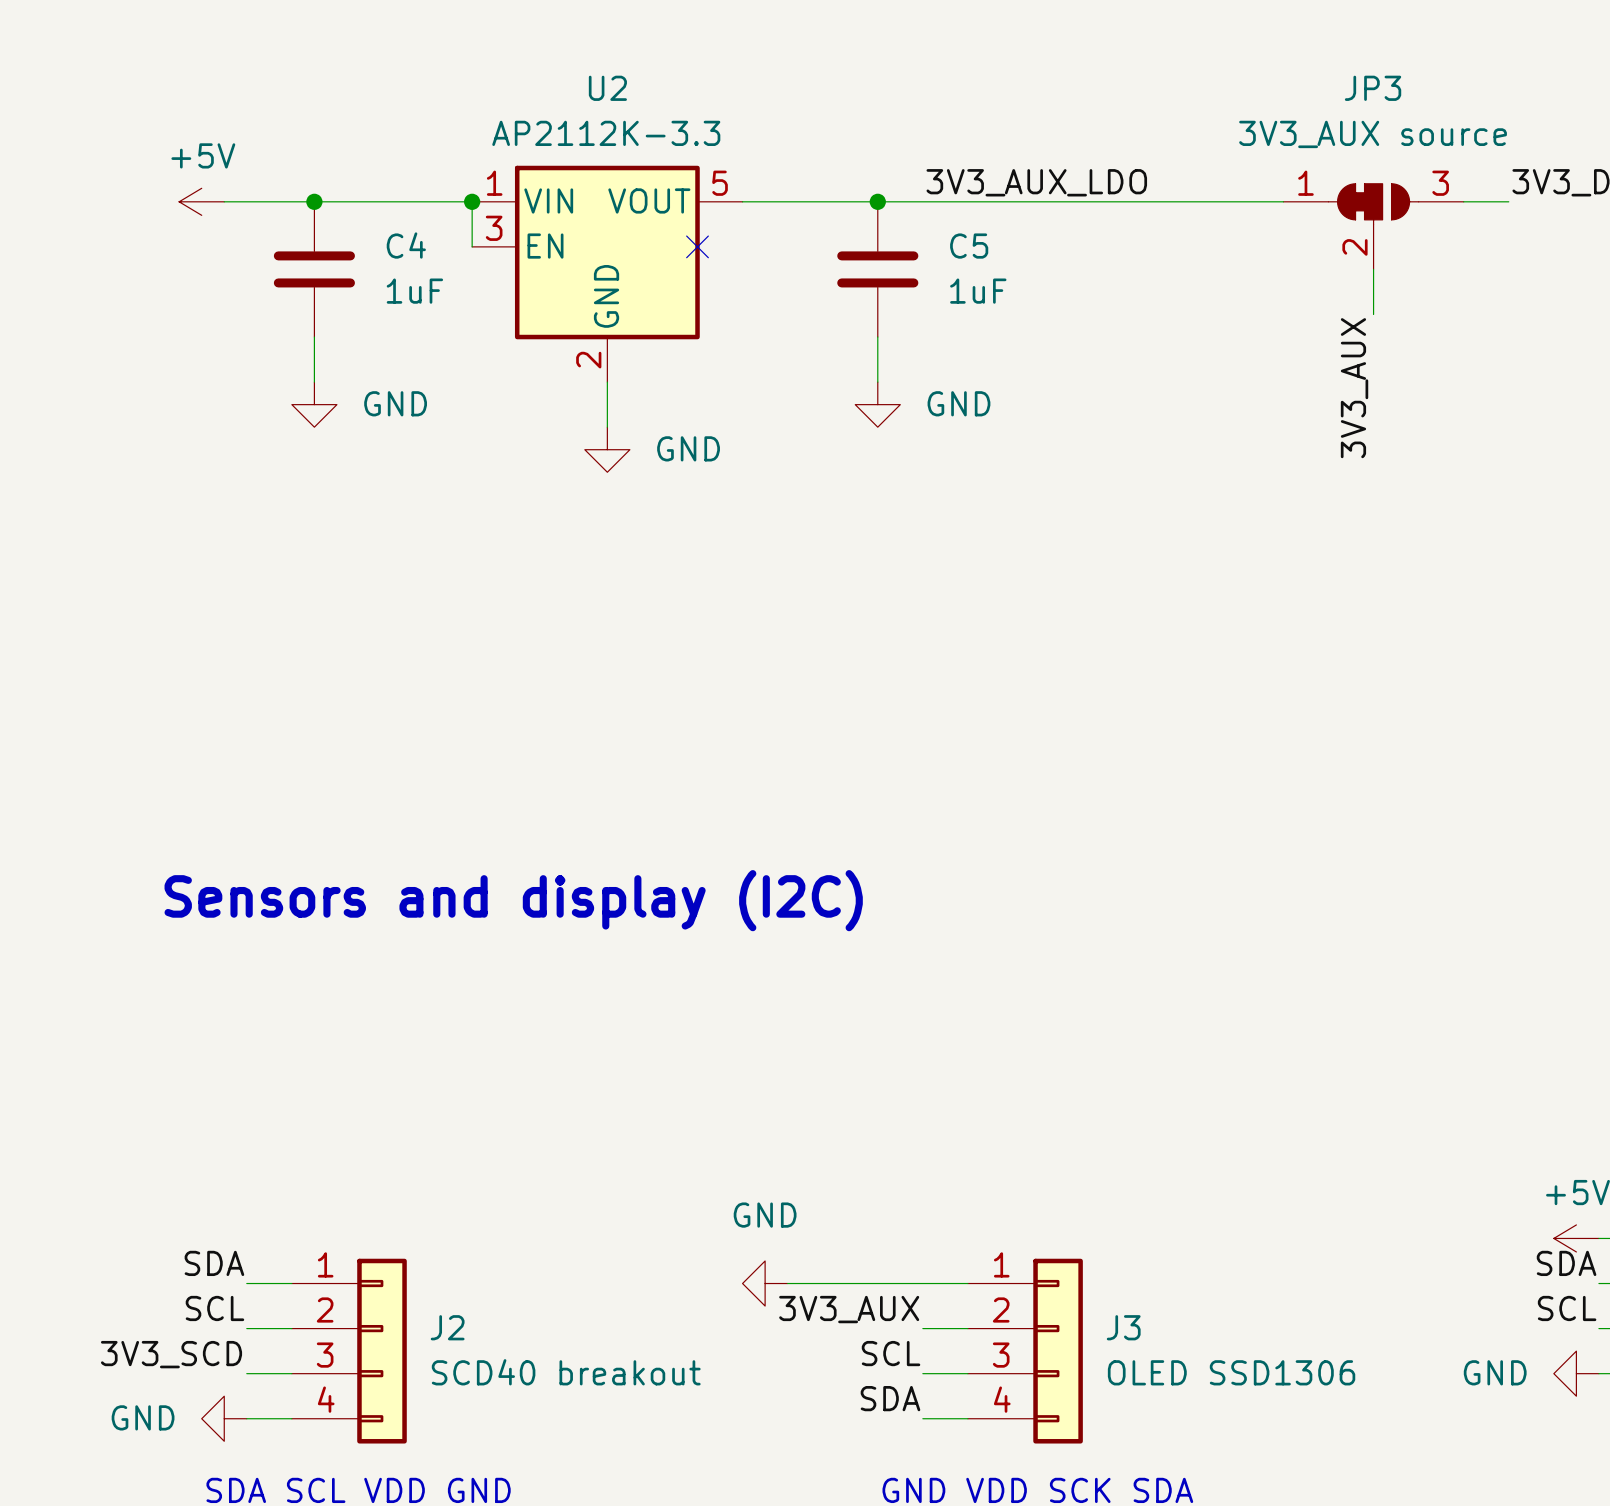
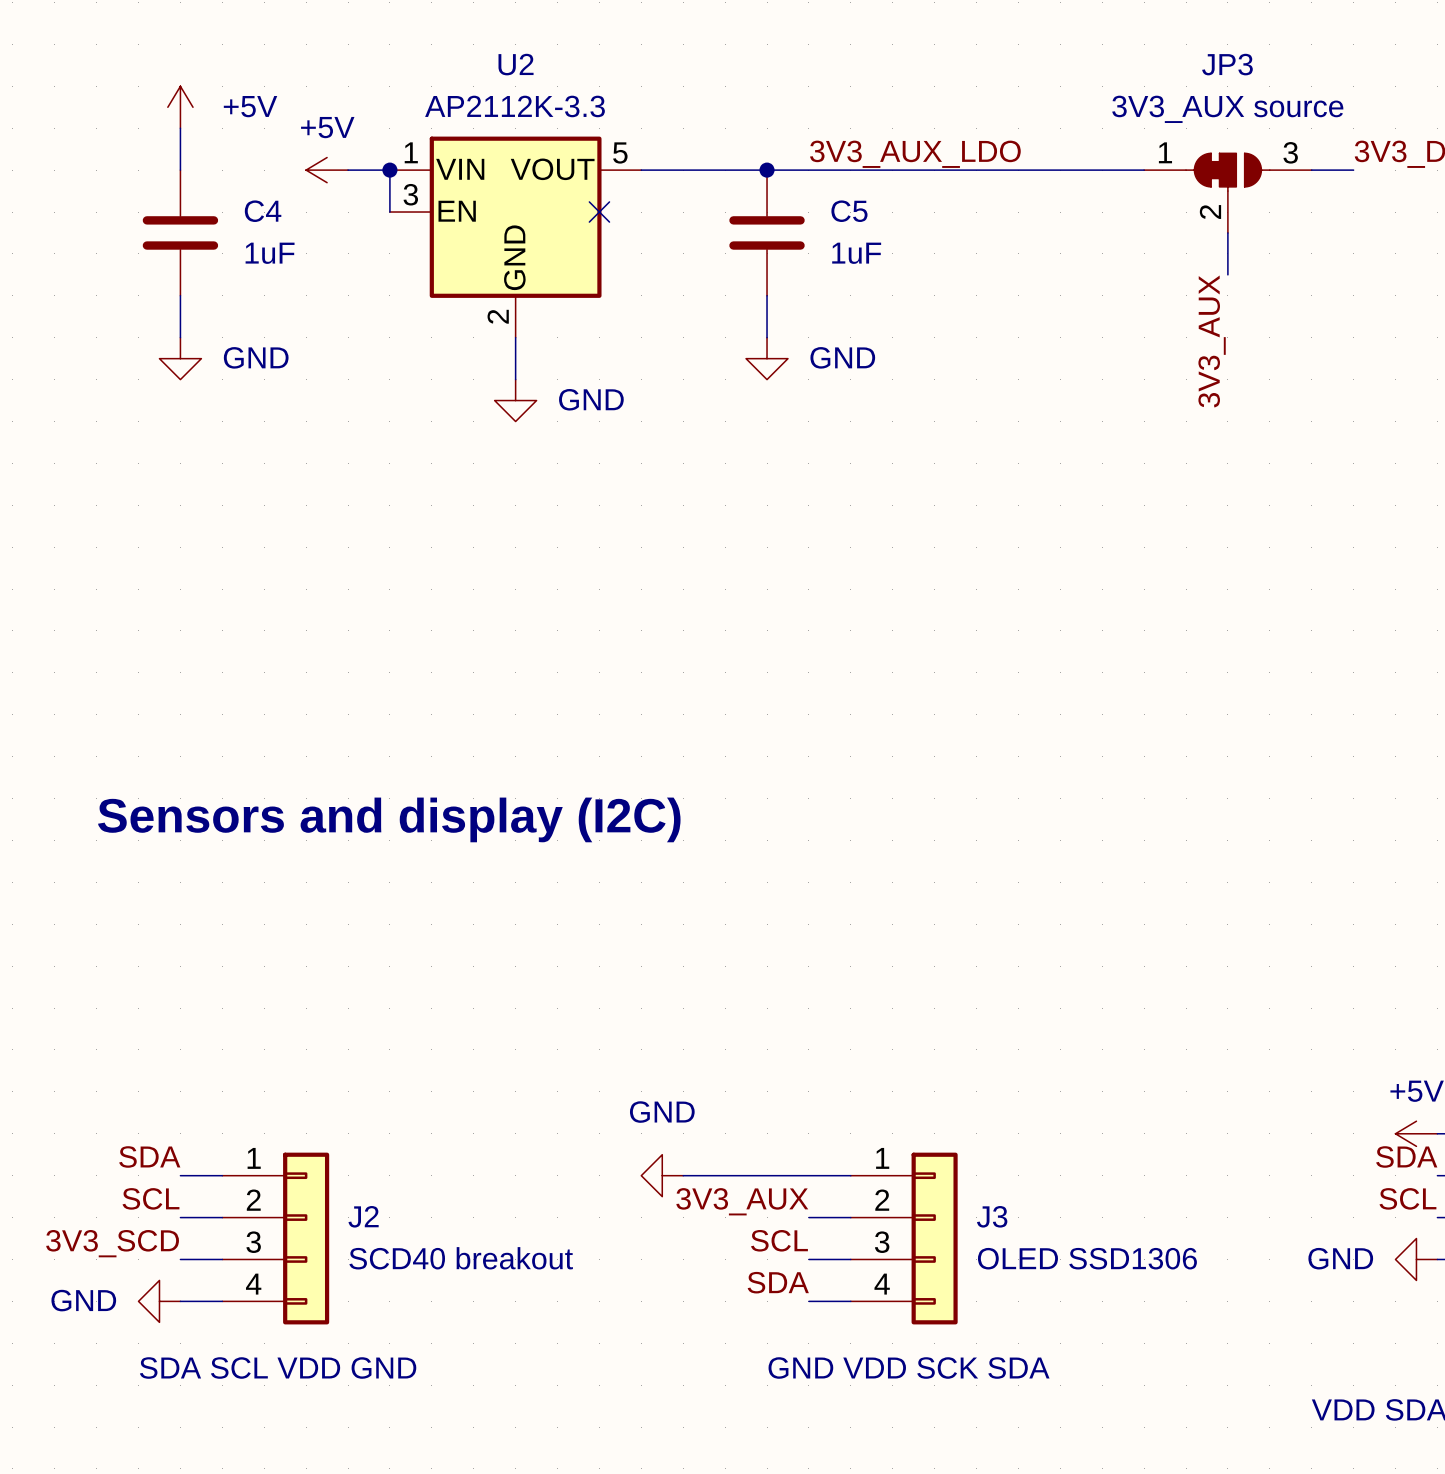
power symbol text position: +5V (203, 155) -> +5V (250, 106)
wire: none -> (180, 128) (180, 170)
power symbol rotation: 0° (201, 201) -> 90° clockwise (180, 107)
power symbol position: +5V (201, 201) -> +5V (180, 107)
wire: (224, 201) (427, 201) -> none
junction: (314, 201) -> none
power symbol: none -> +5V (327, 170)
C4 position: (314, 269) -> (180, 232)
wire: (314, 337) (314, 382) -> (180, 295) (180, 337)
power symbol position: GND (314, 404) -> GND (180, 358)

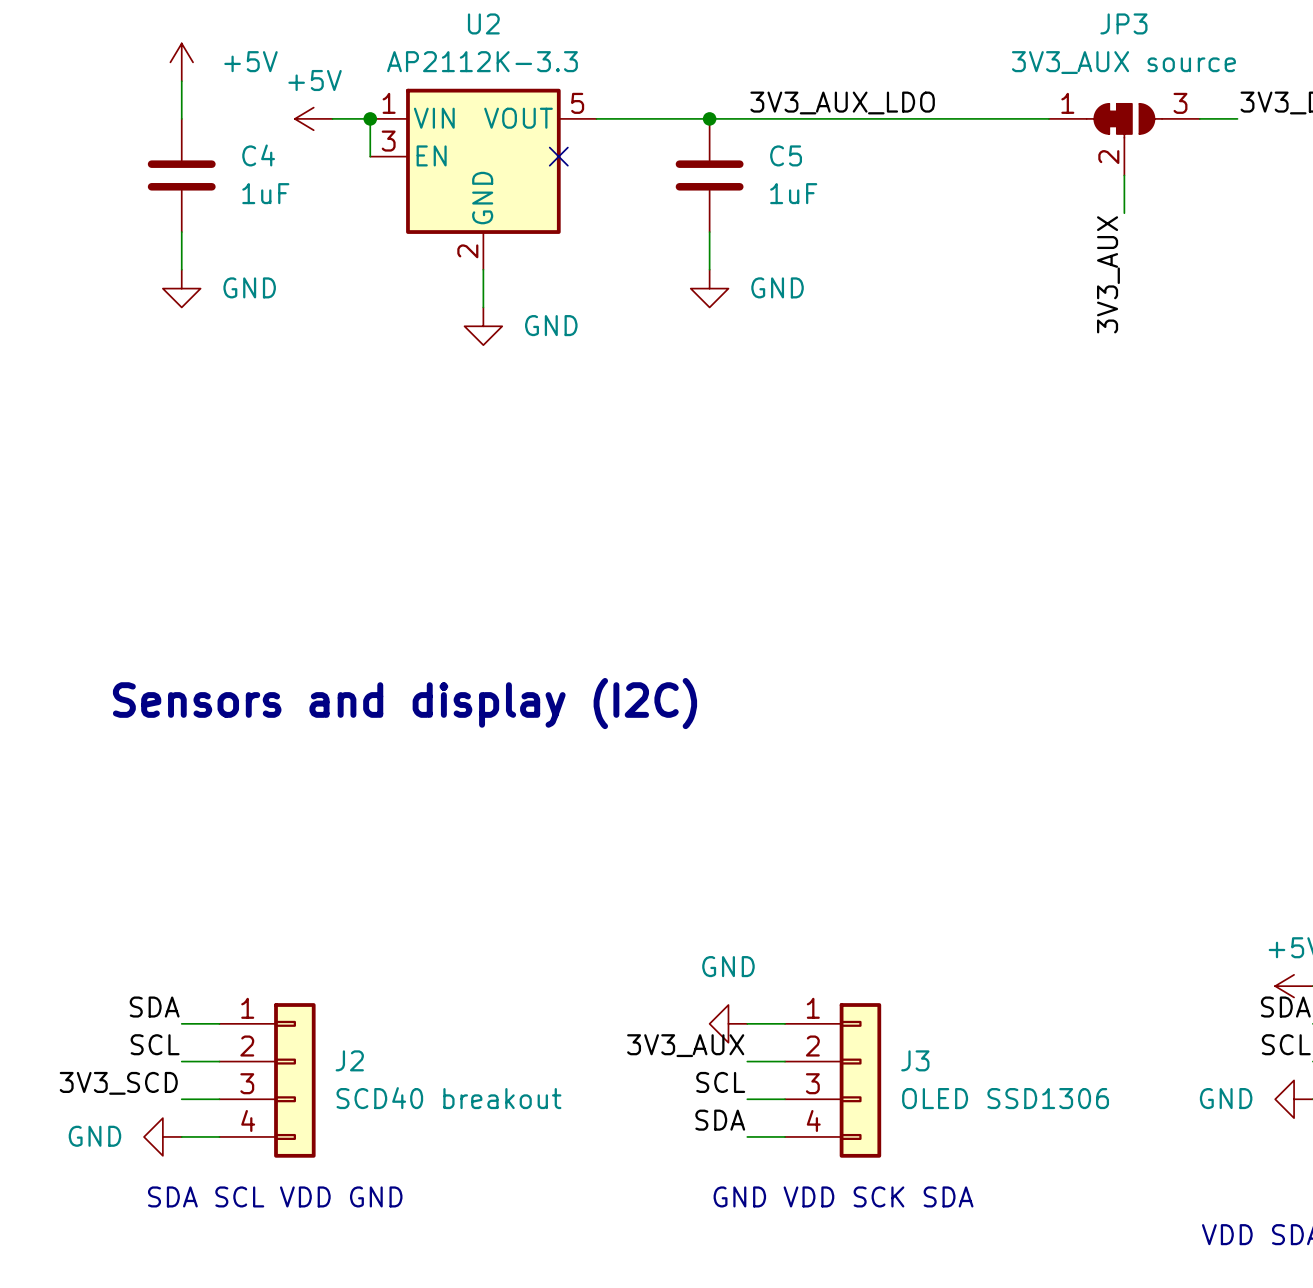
power symbol position: GND (662, 1175) -> GND (728, 1023)
wire: (683, 1175) (808, 1175) -> none

